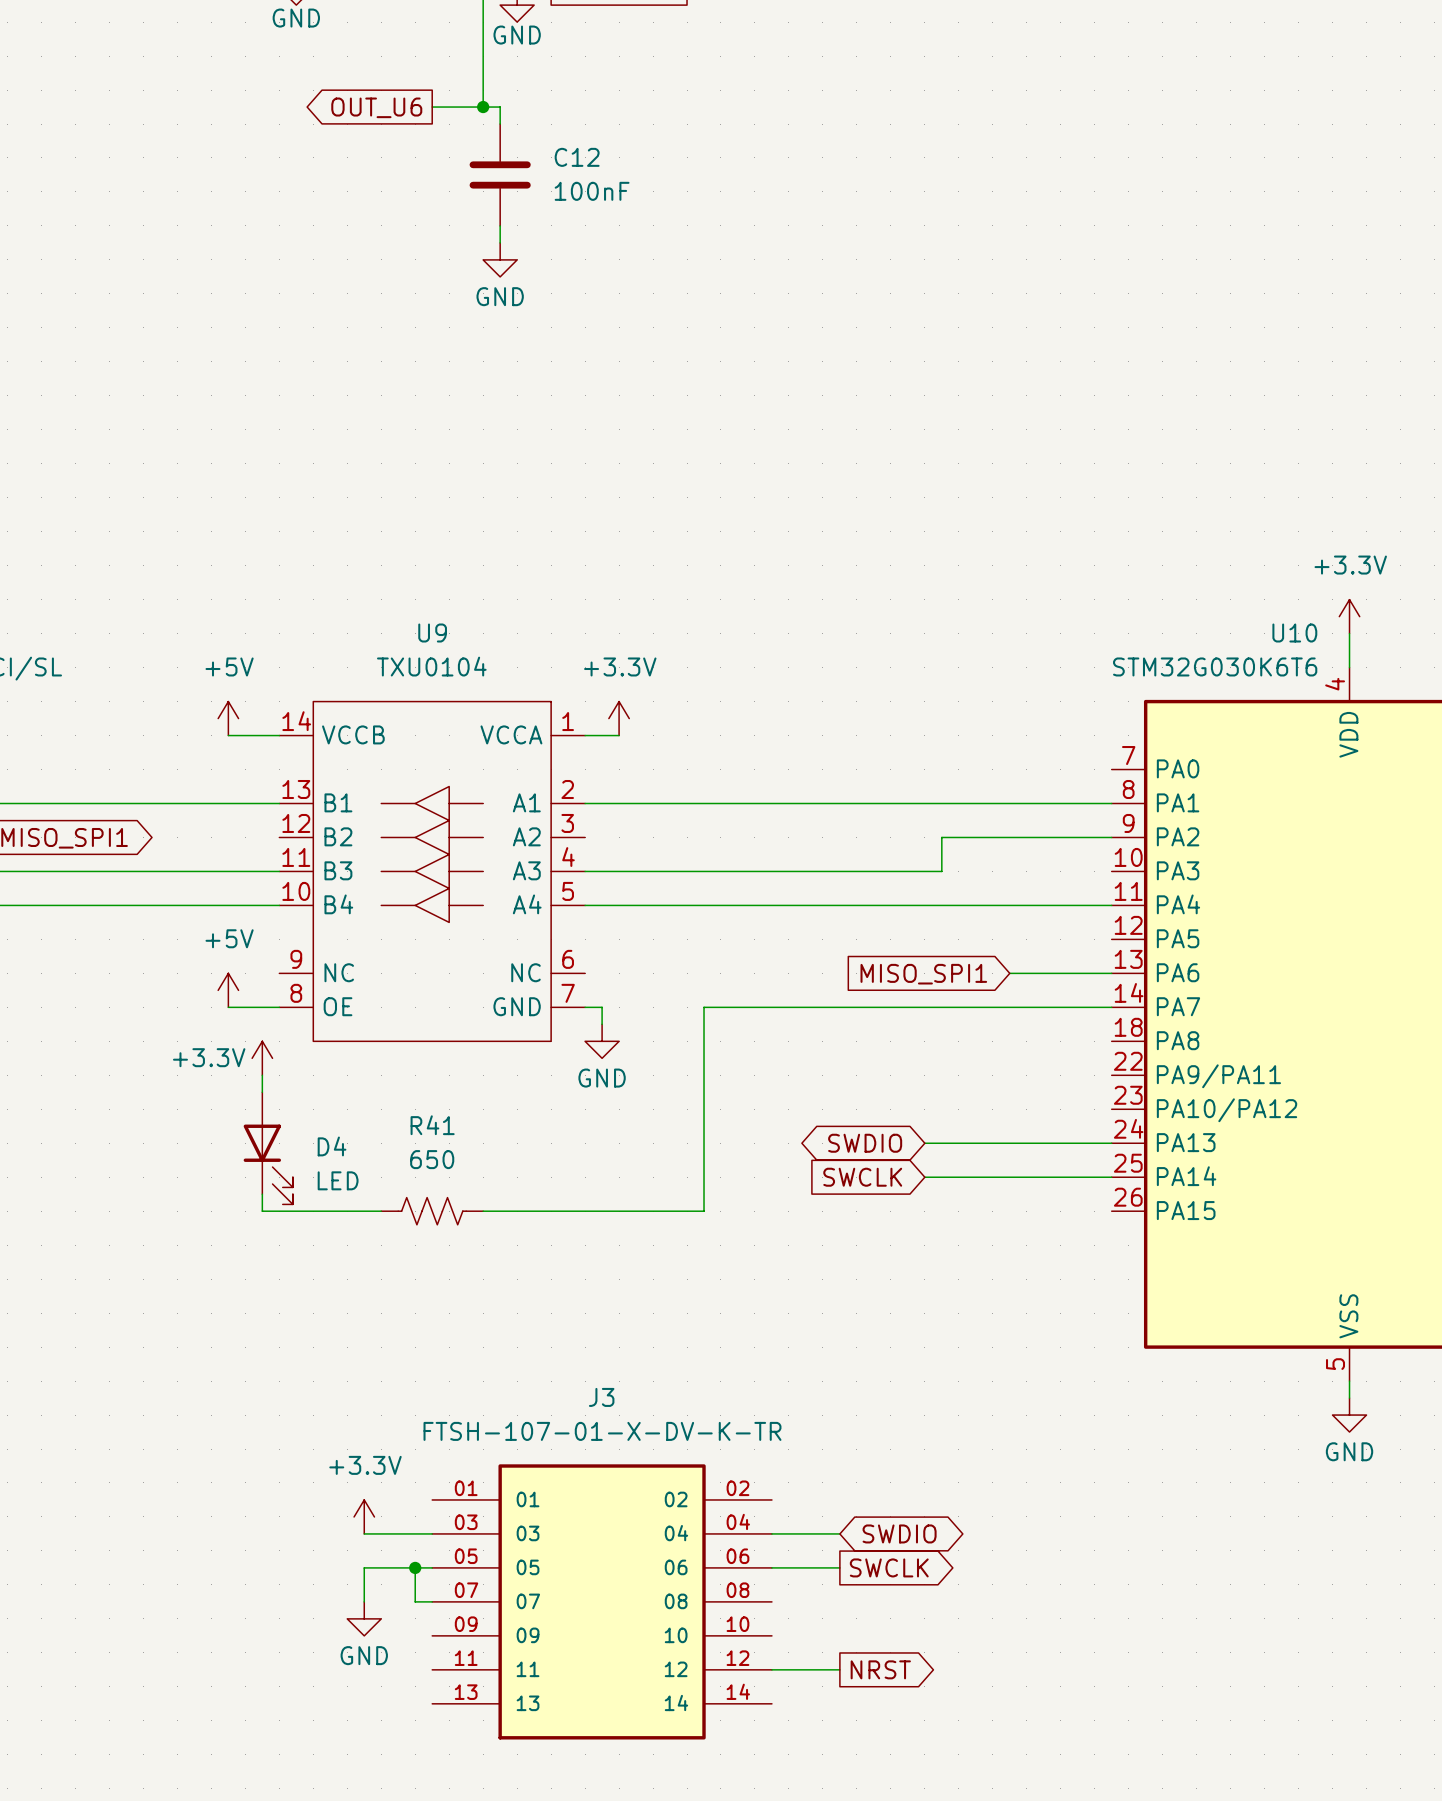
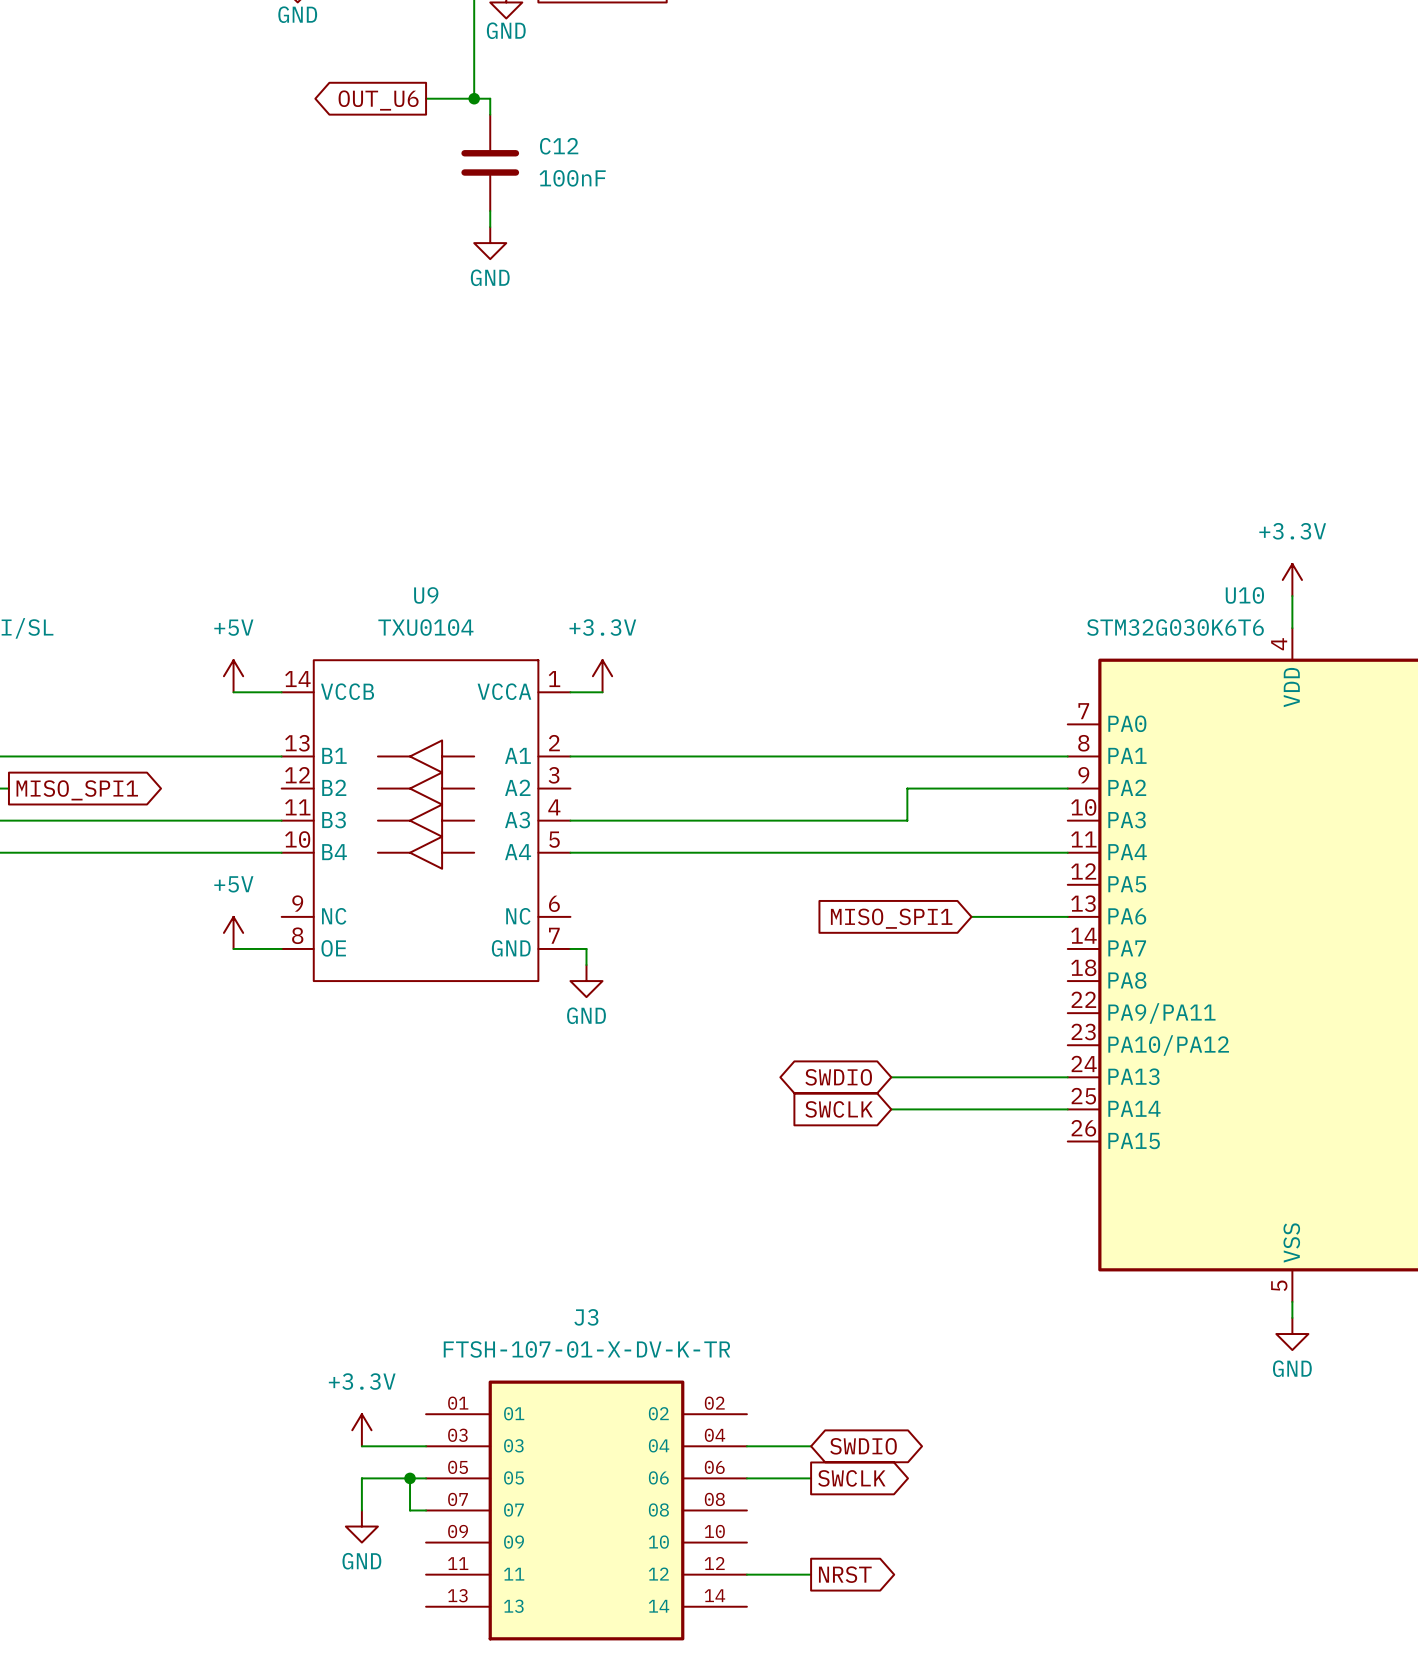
wire: (1111, 1007) (704, 1007) (704, 1211) (483, 1211) -> none
power symbol: +3.3V (262, 1058) -> none
wire: (262, 1075) (262, 1092) -> none
D4: LED (268, 1148) -> none
wire: (262, 1194) (262, 1211) (381, 1211) -> none
R41: 650 (432, 1211) -> none

